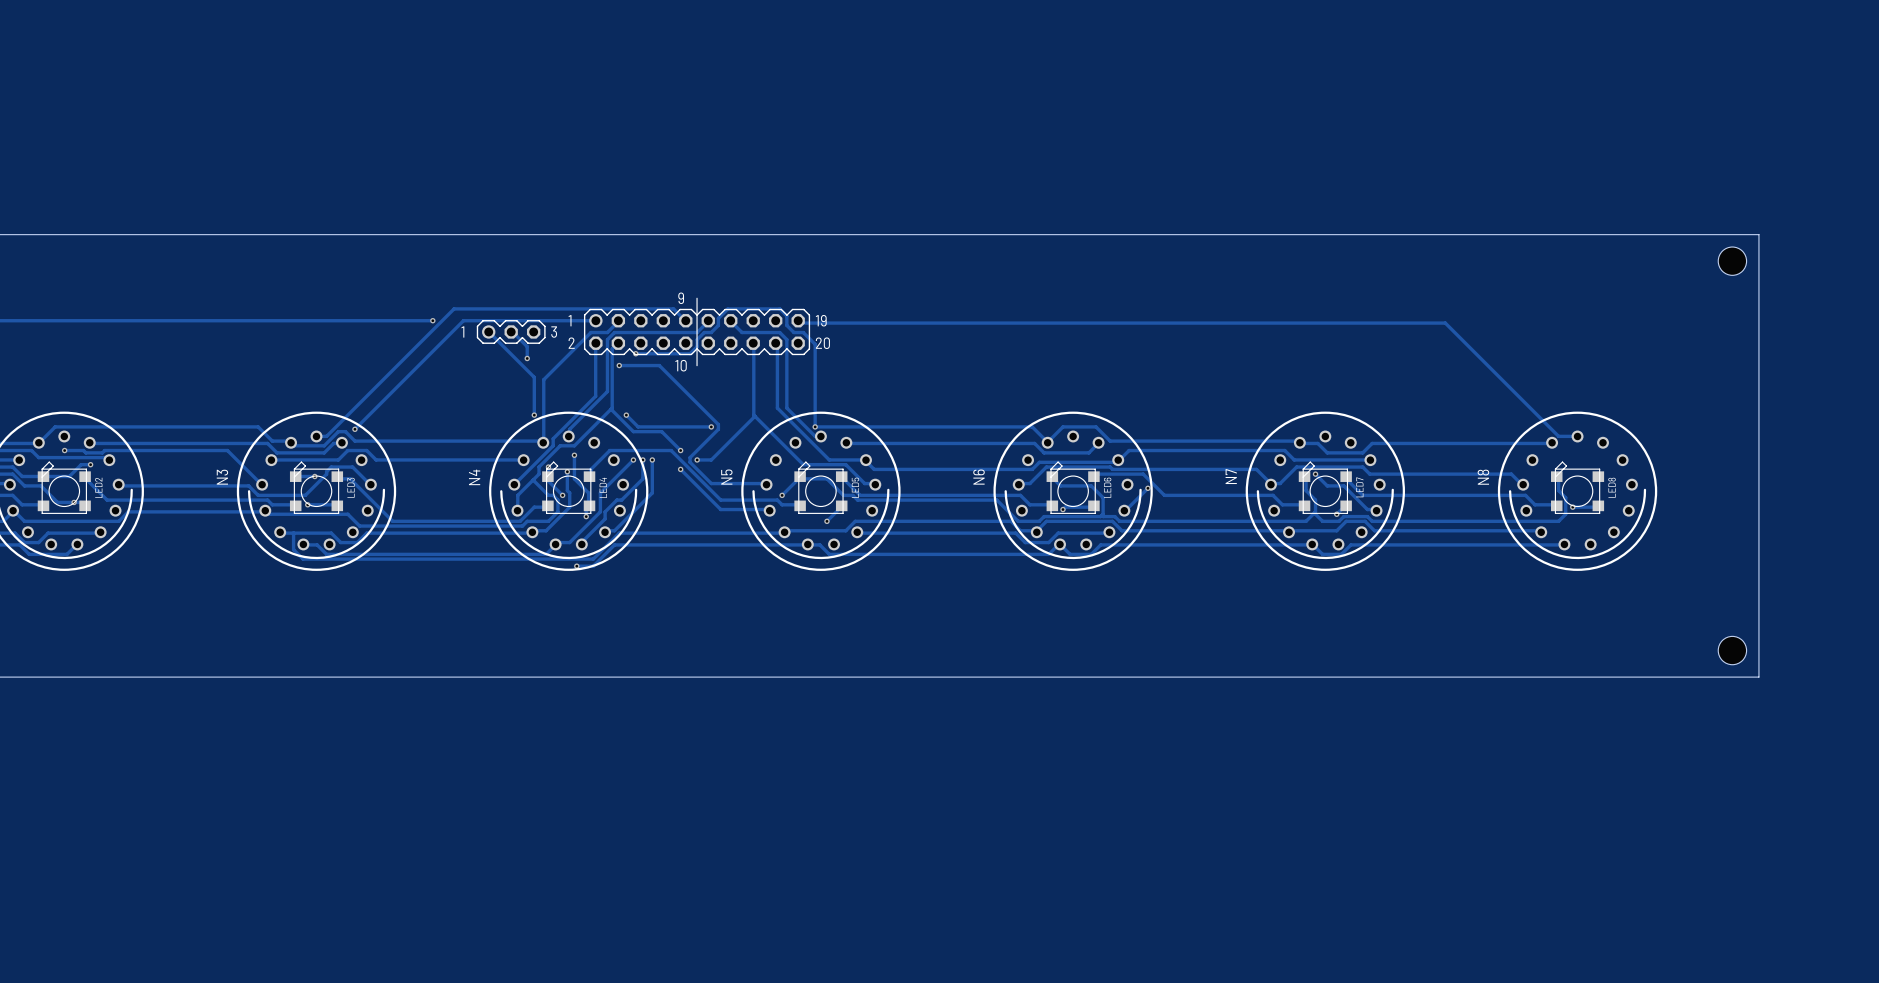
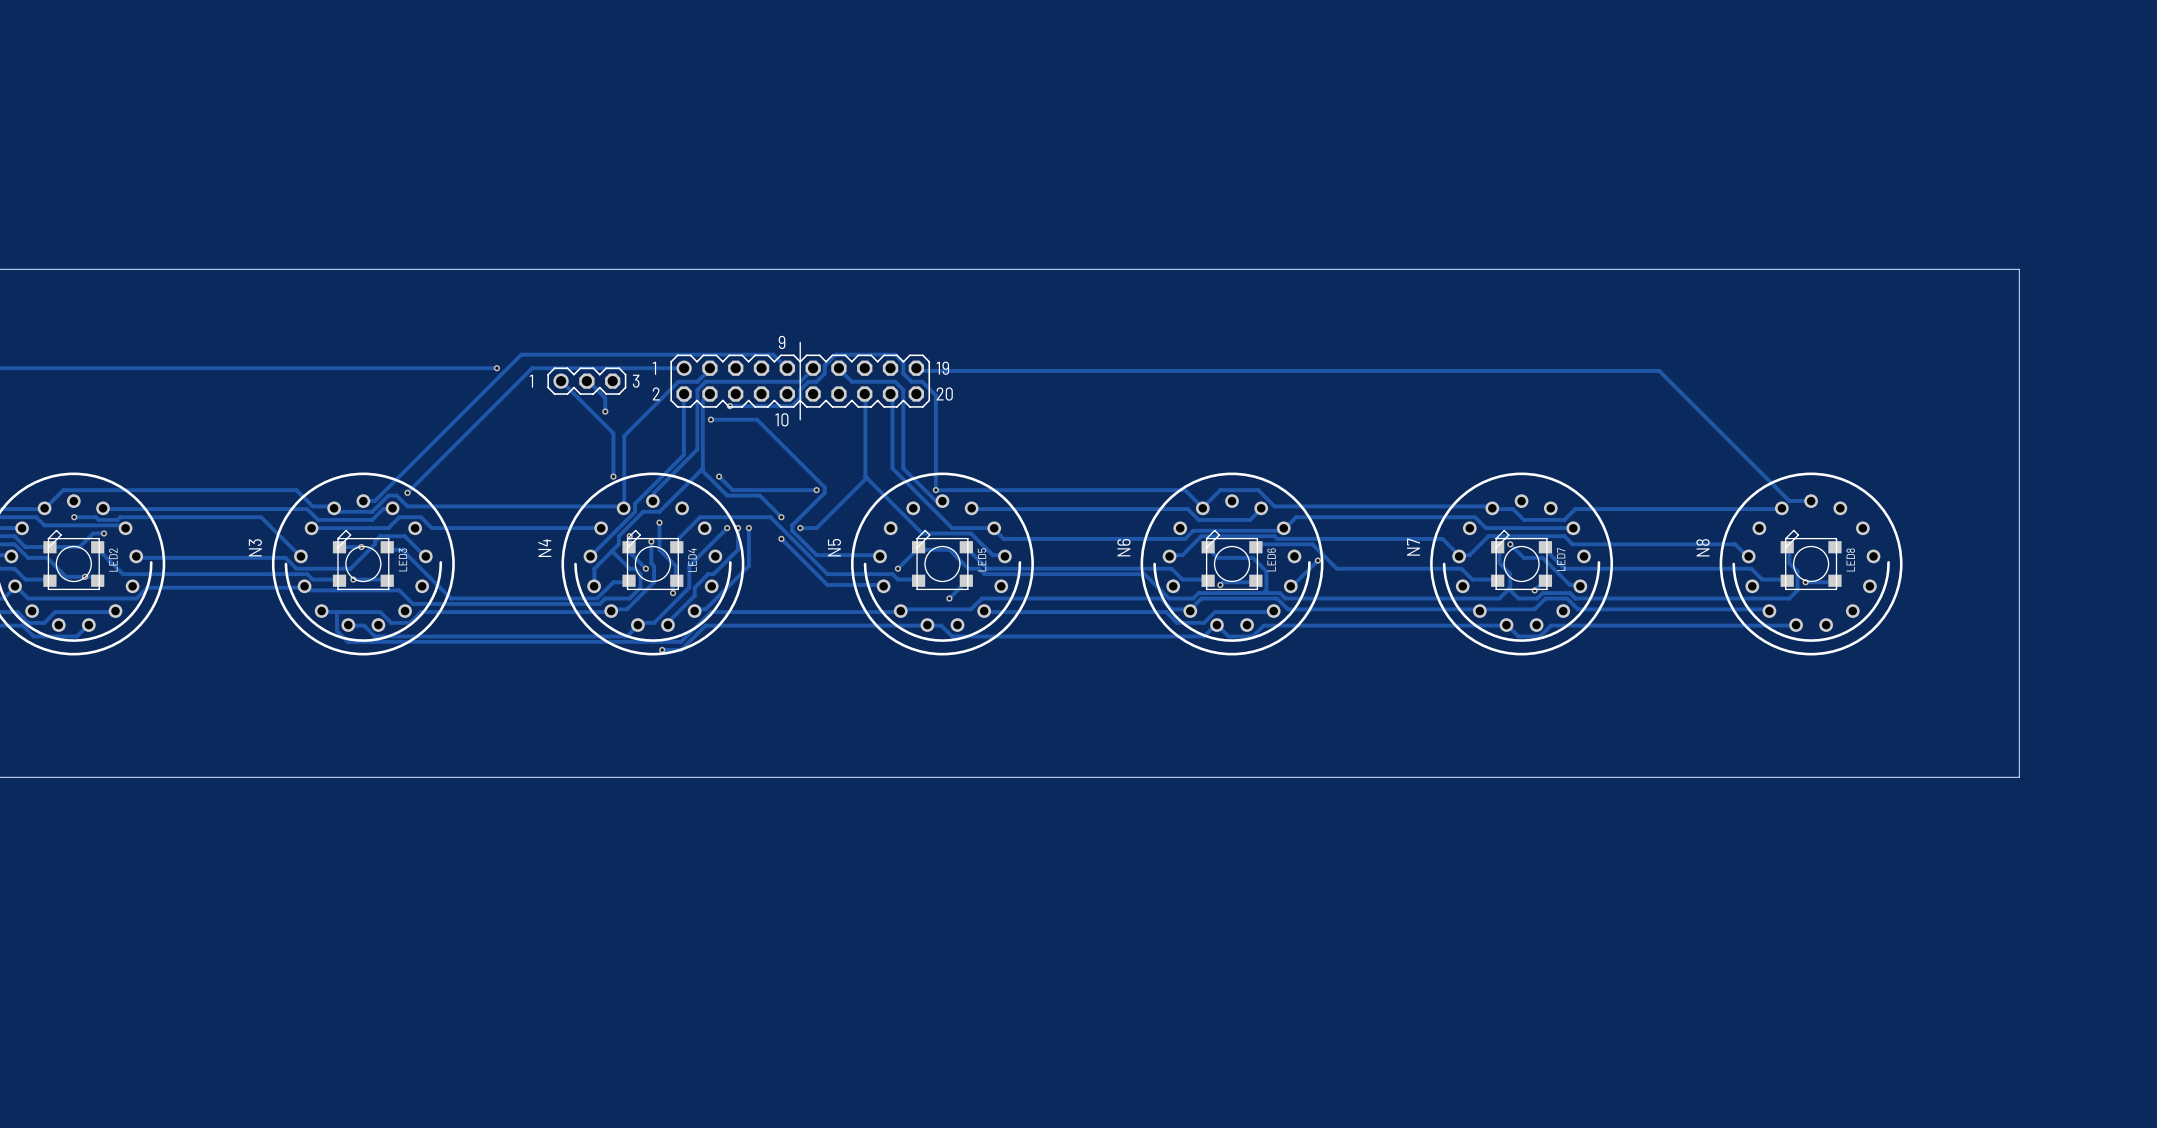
hole: (1732, 261) -> none
hole: (1732, 650) -> none

